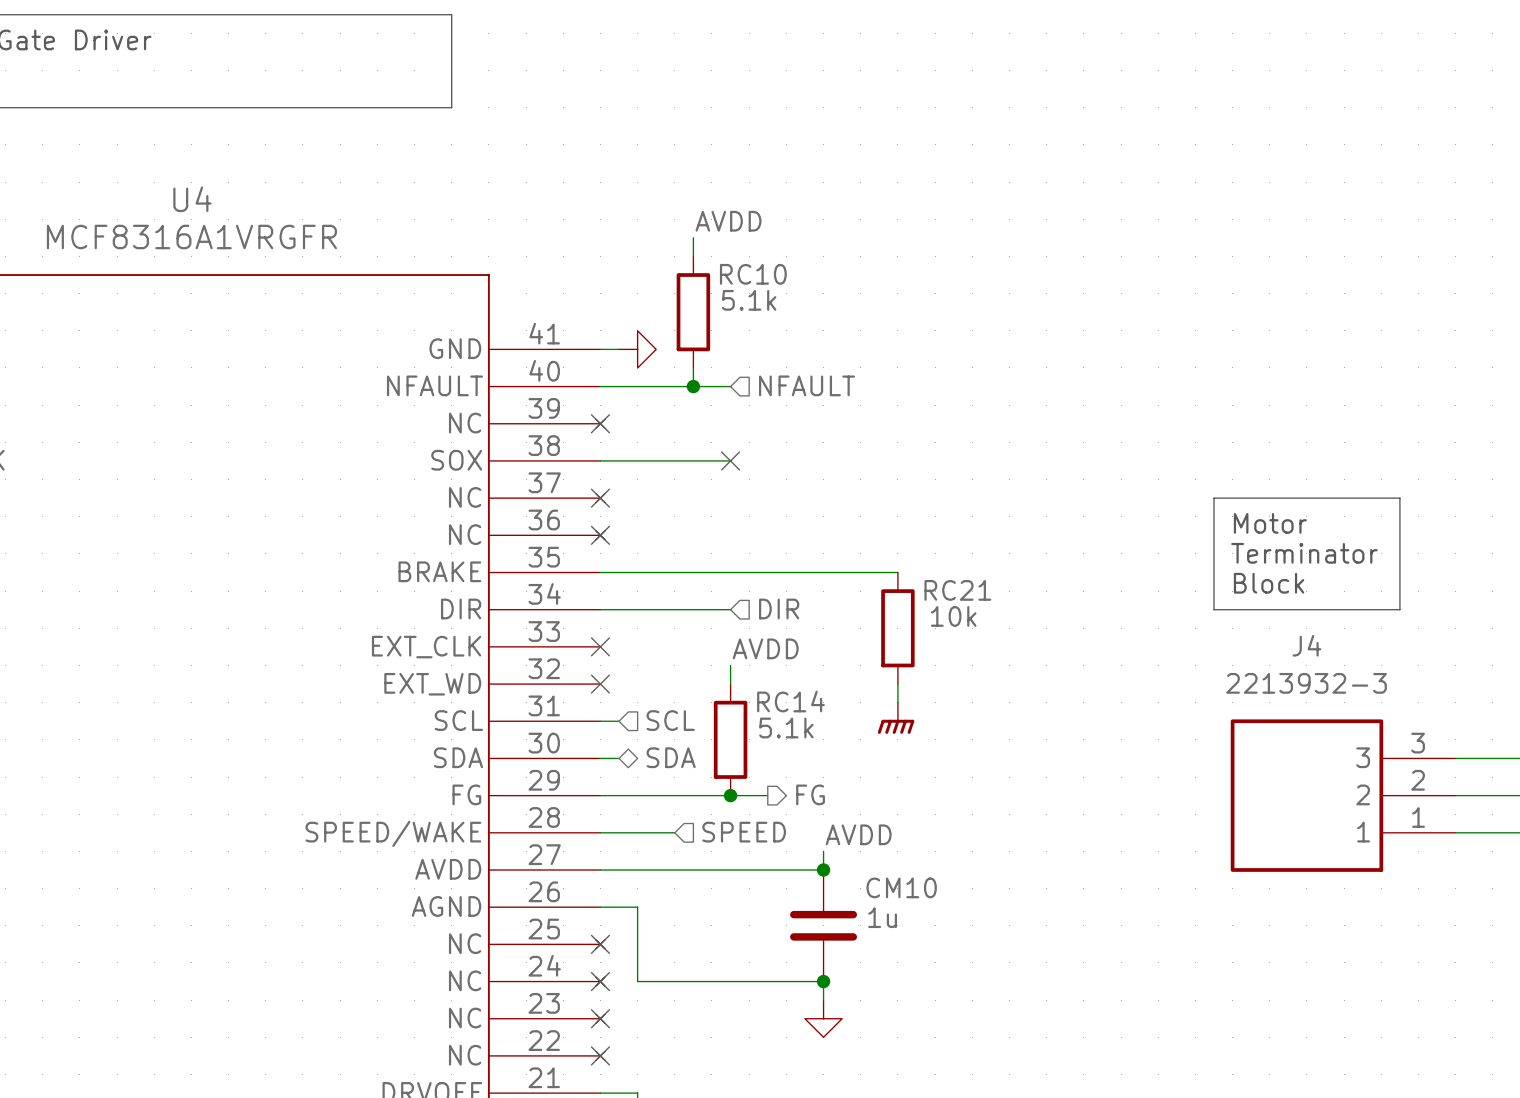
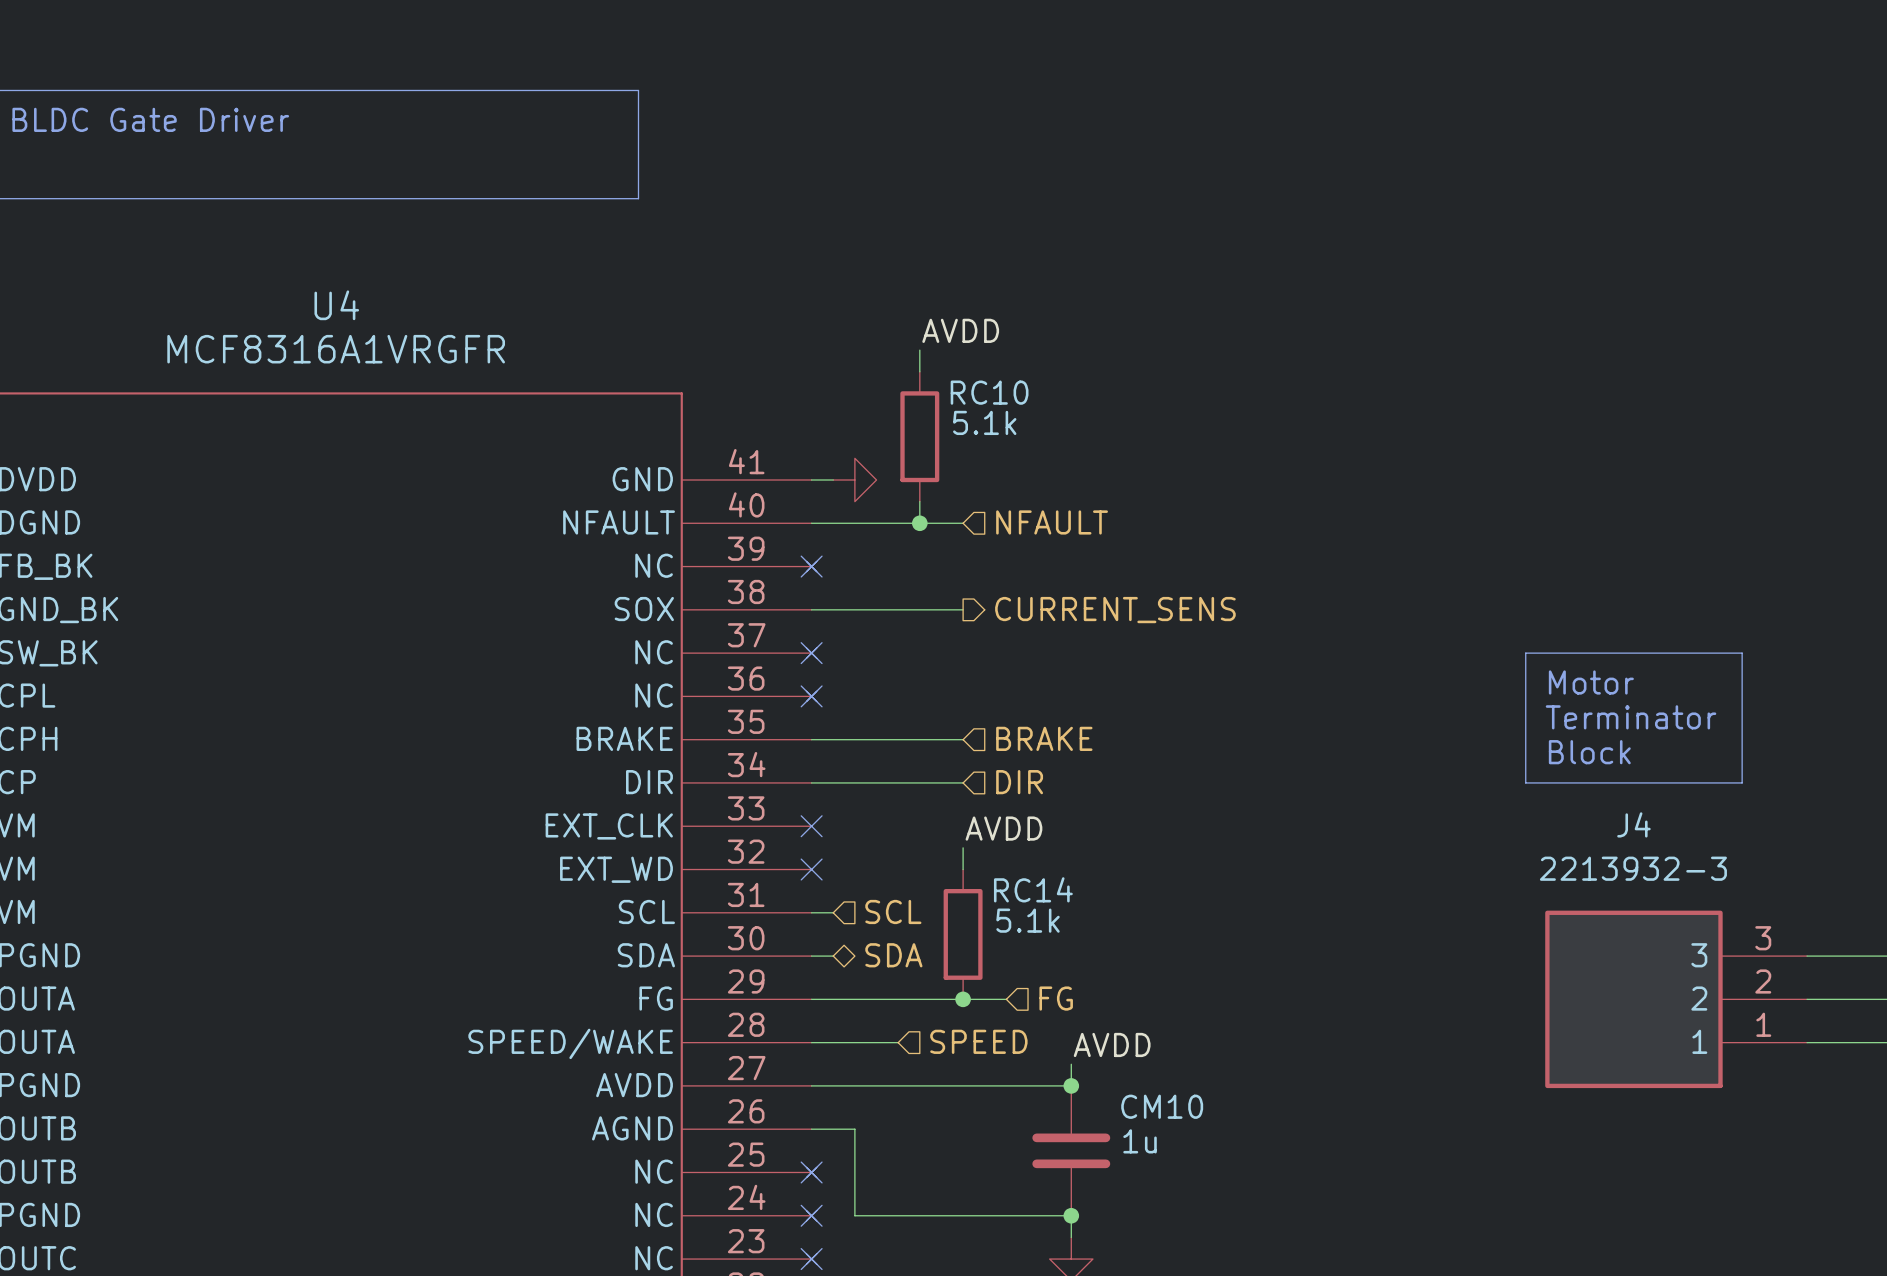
no-connect mark: (730, 460) -> none
hierarchical label: none -> CURRENT_SENS (1115, 610)
hierarchical label: none -> BRAKE (1044, 738)
wire: (730, 572) (897, 572) -> none
RC21: 10k (897, 628) -> none
wire: (897, 684) (897, 702) -> none
power symbol: (896, 718) -> none
hierarchical label shape: output (810, 794) -> input (1056, 998)

